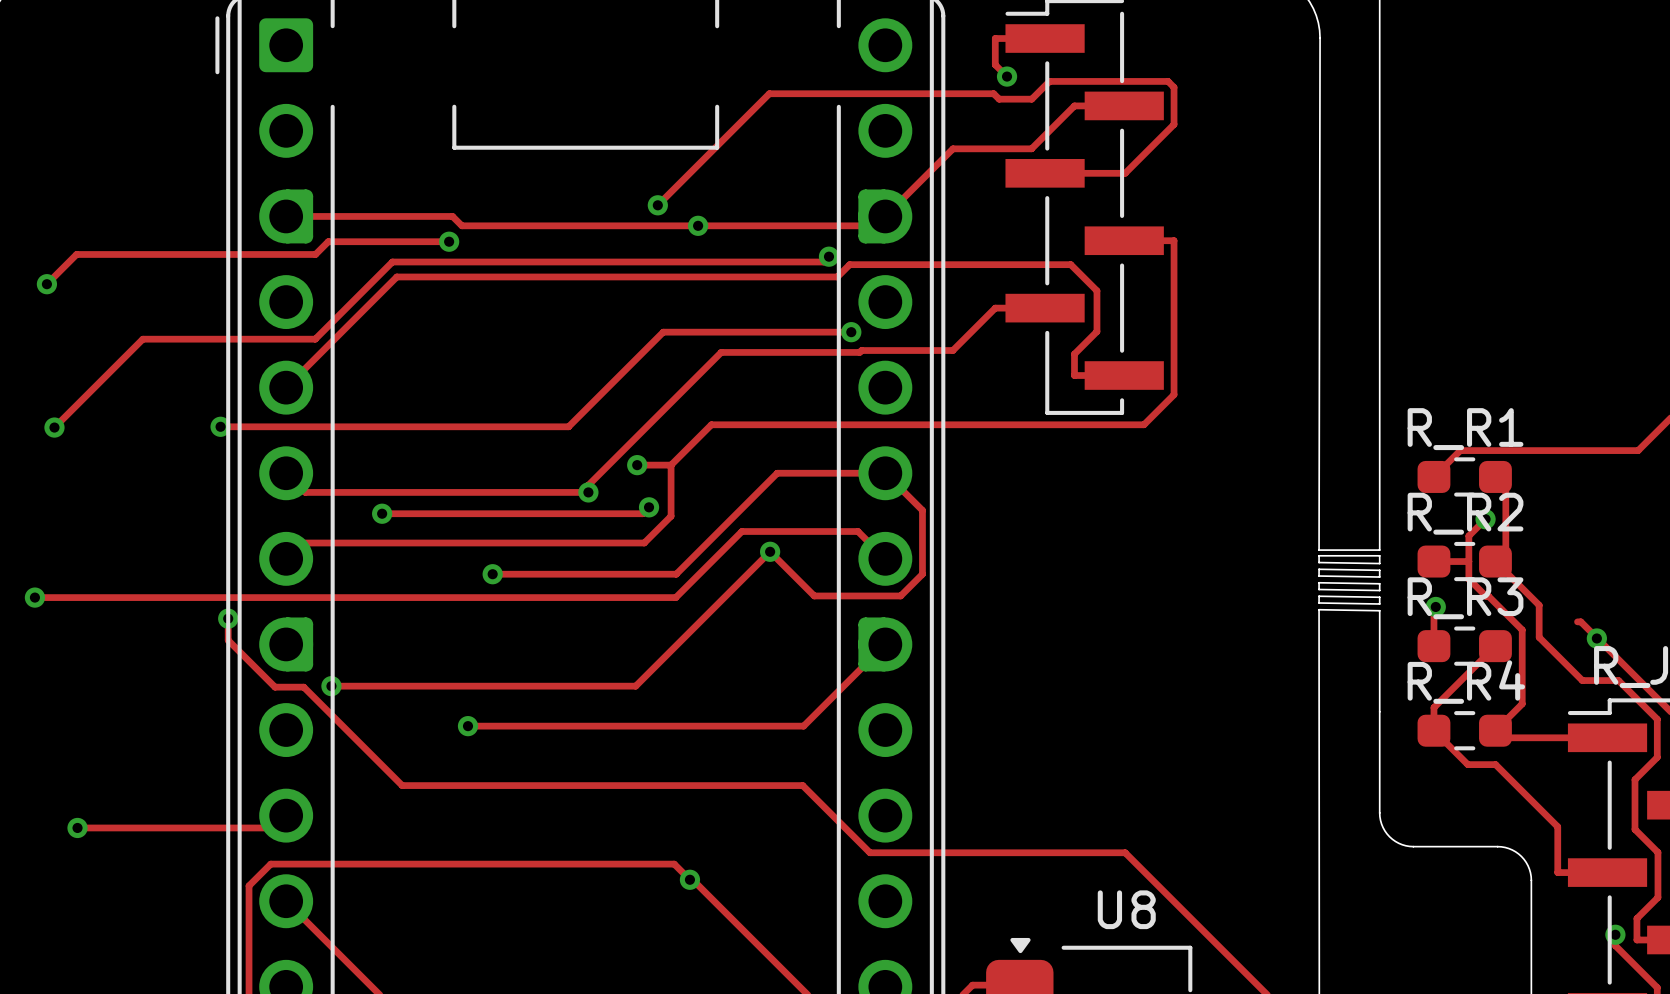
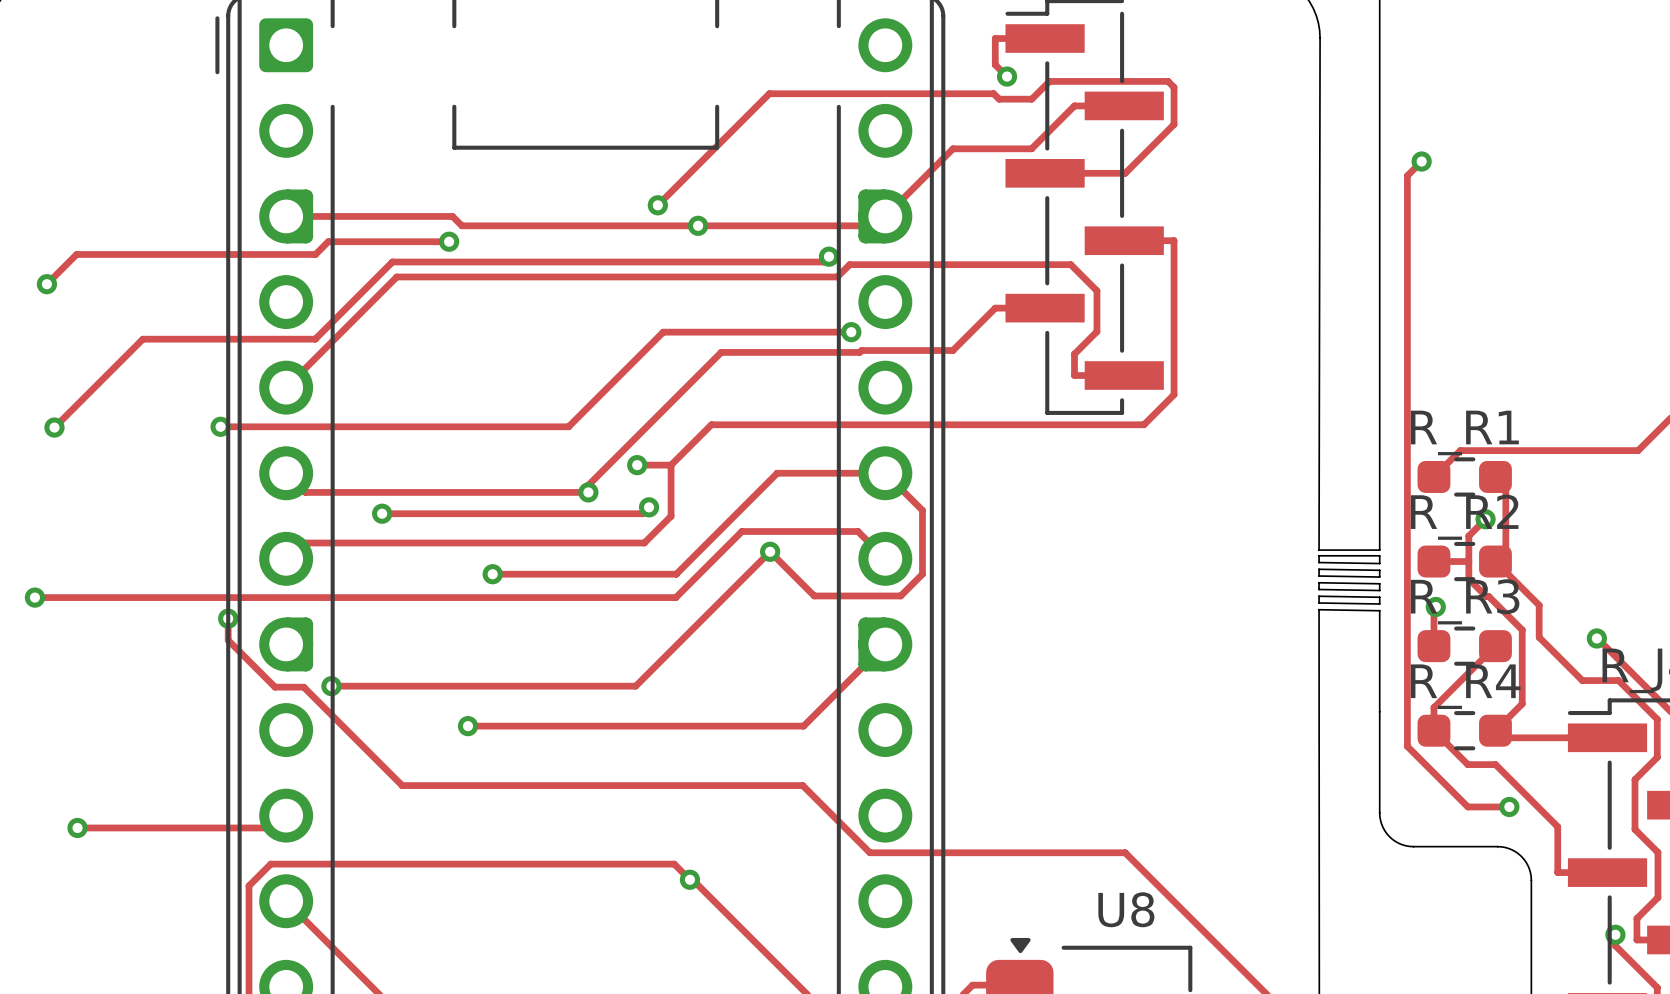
track: none -> (1421, 161) (1407, 175) (1407, 746) (1467, 806) (1509, 806)
via: none -> (1421, 161)
track: (1577, 621) (1580, 621) (1597, 638) -> none
via: none -> (1509, 806)

